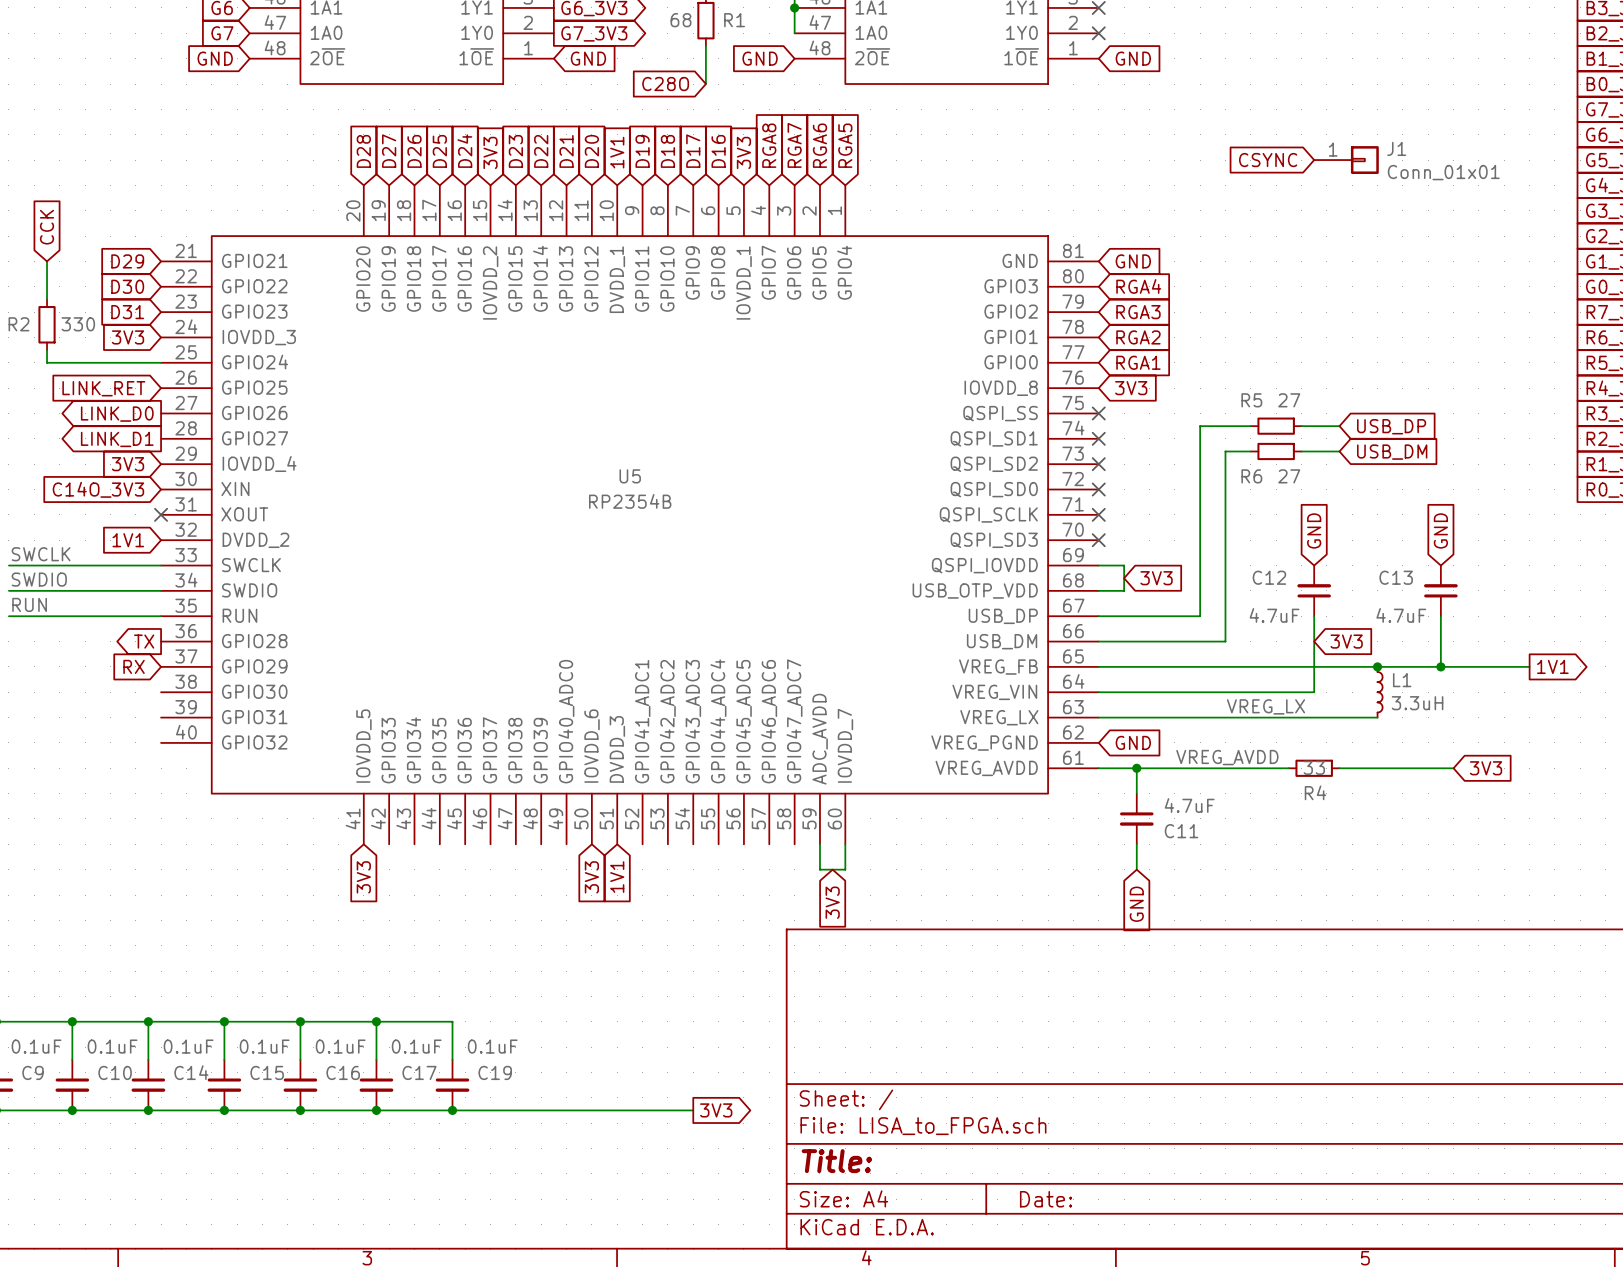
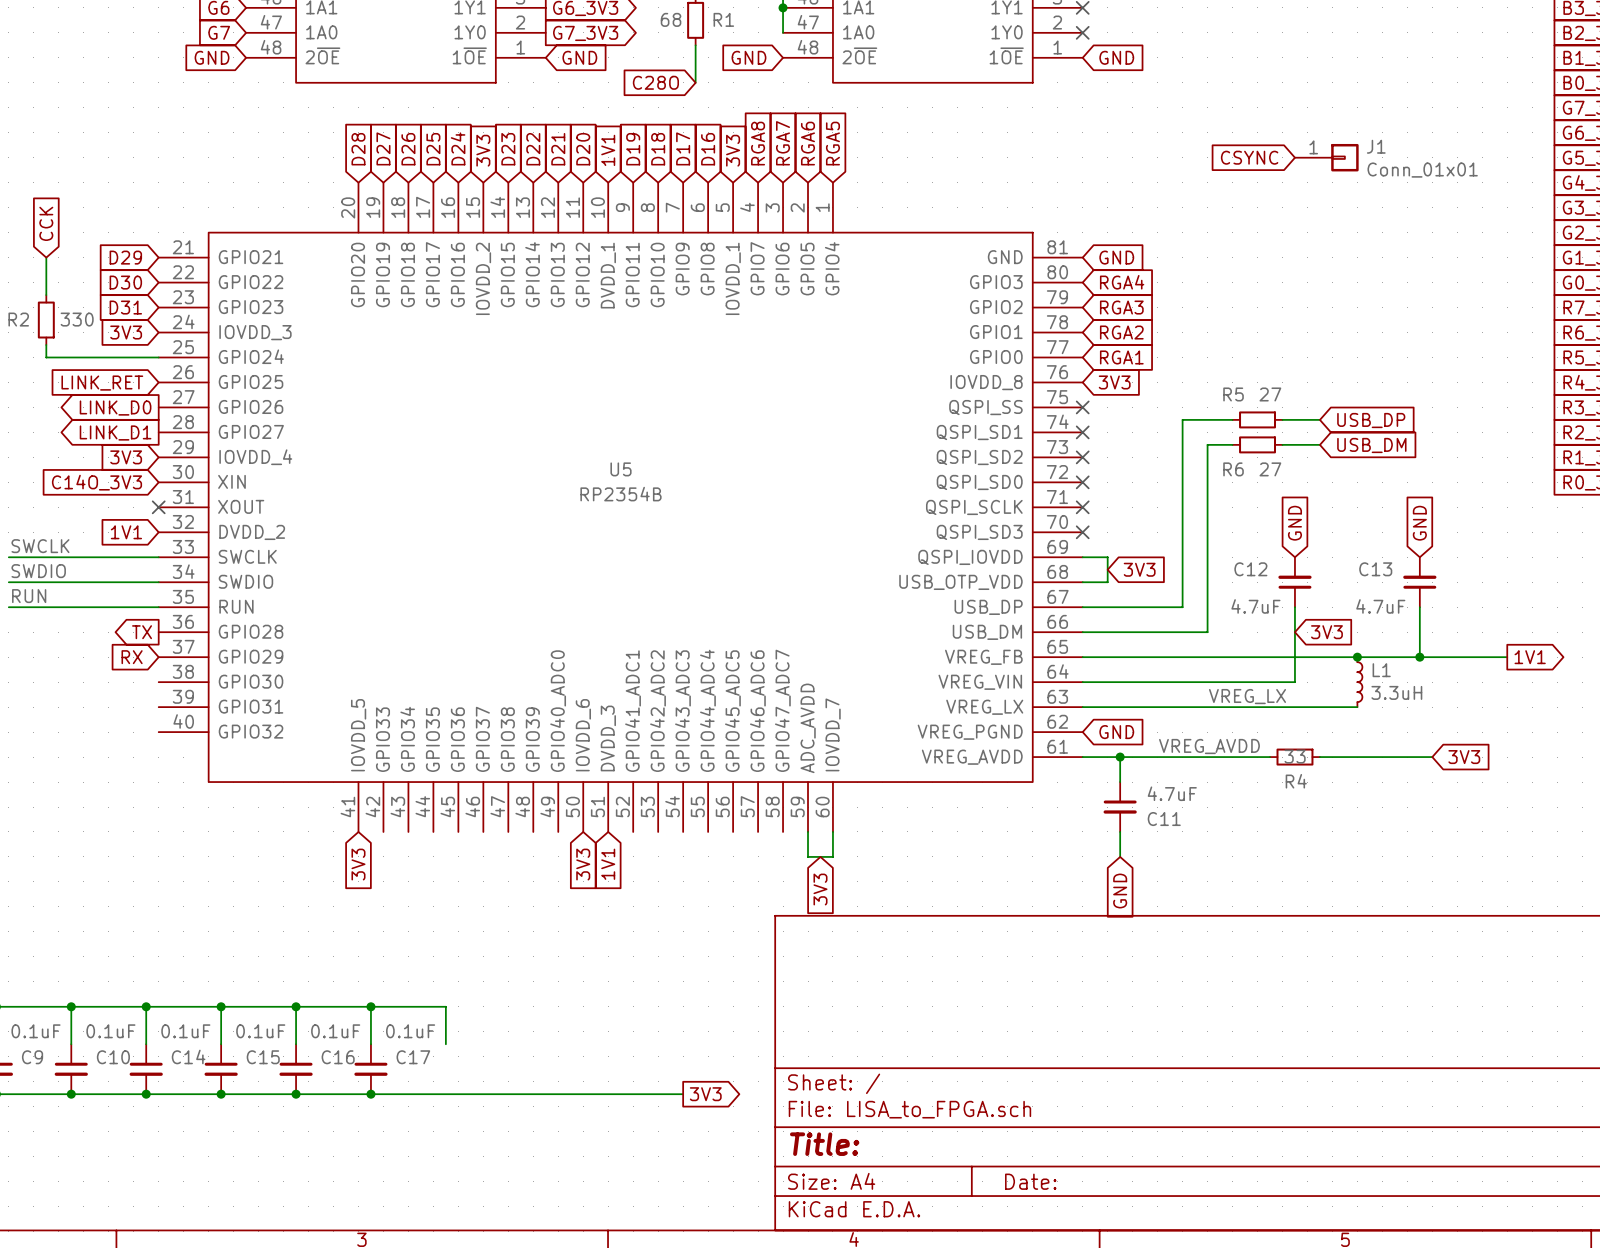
C19: 0.1uF (452, 1085) -> none
junction: (452, 1110) -> none

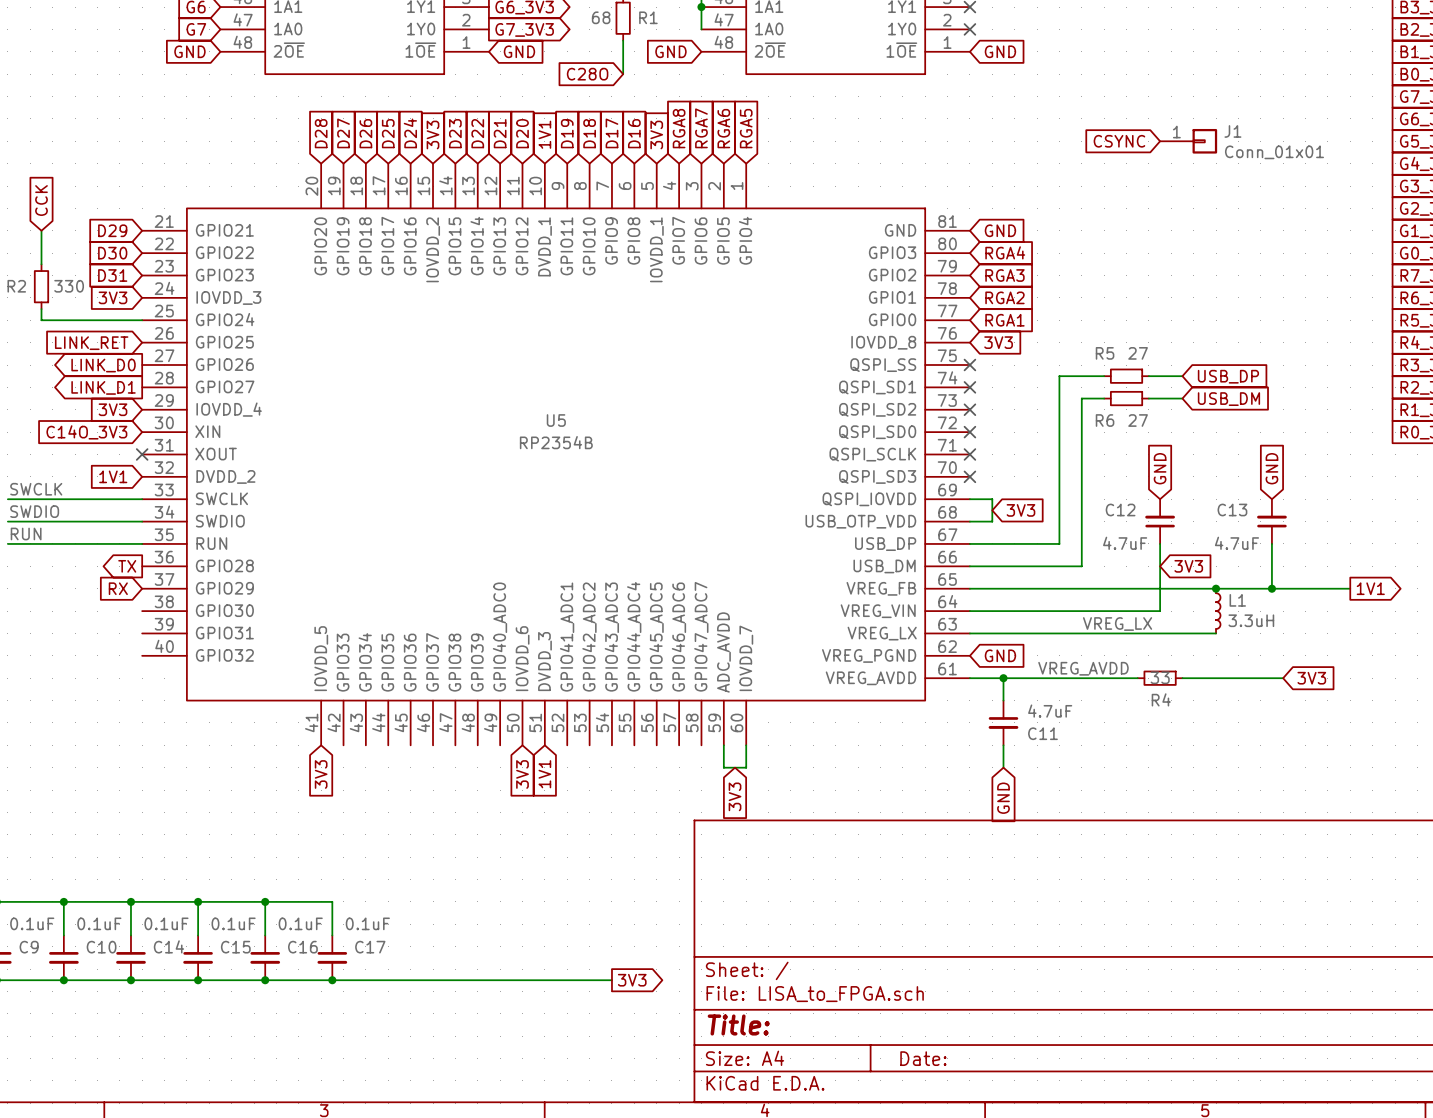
wire: (370, 1006) (445, 1006) (445, 1044) -> none
junction: (370, 1006) -> none

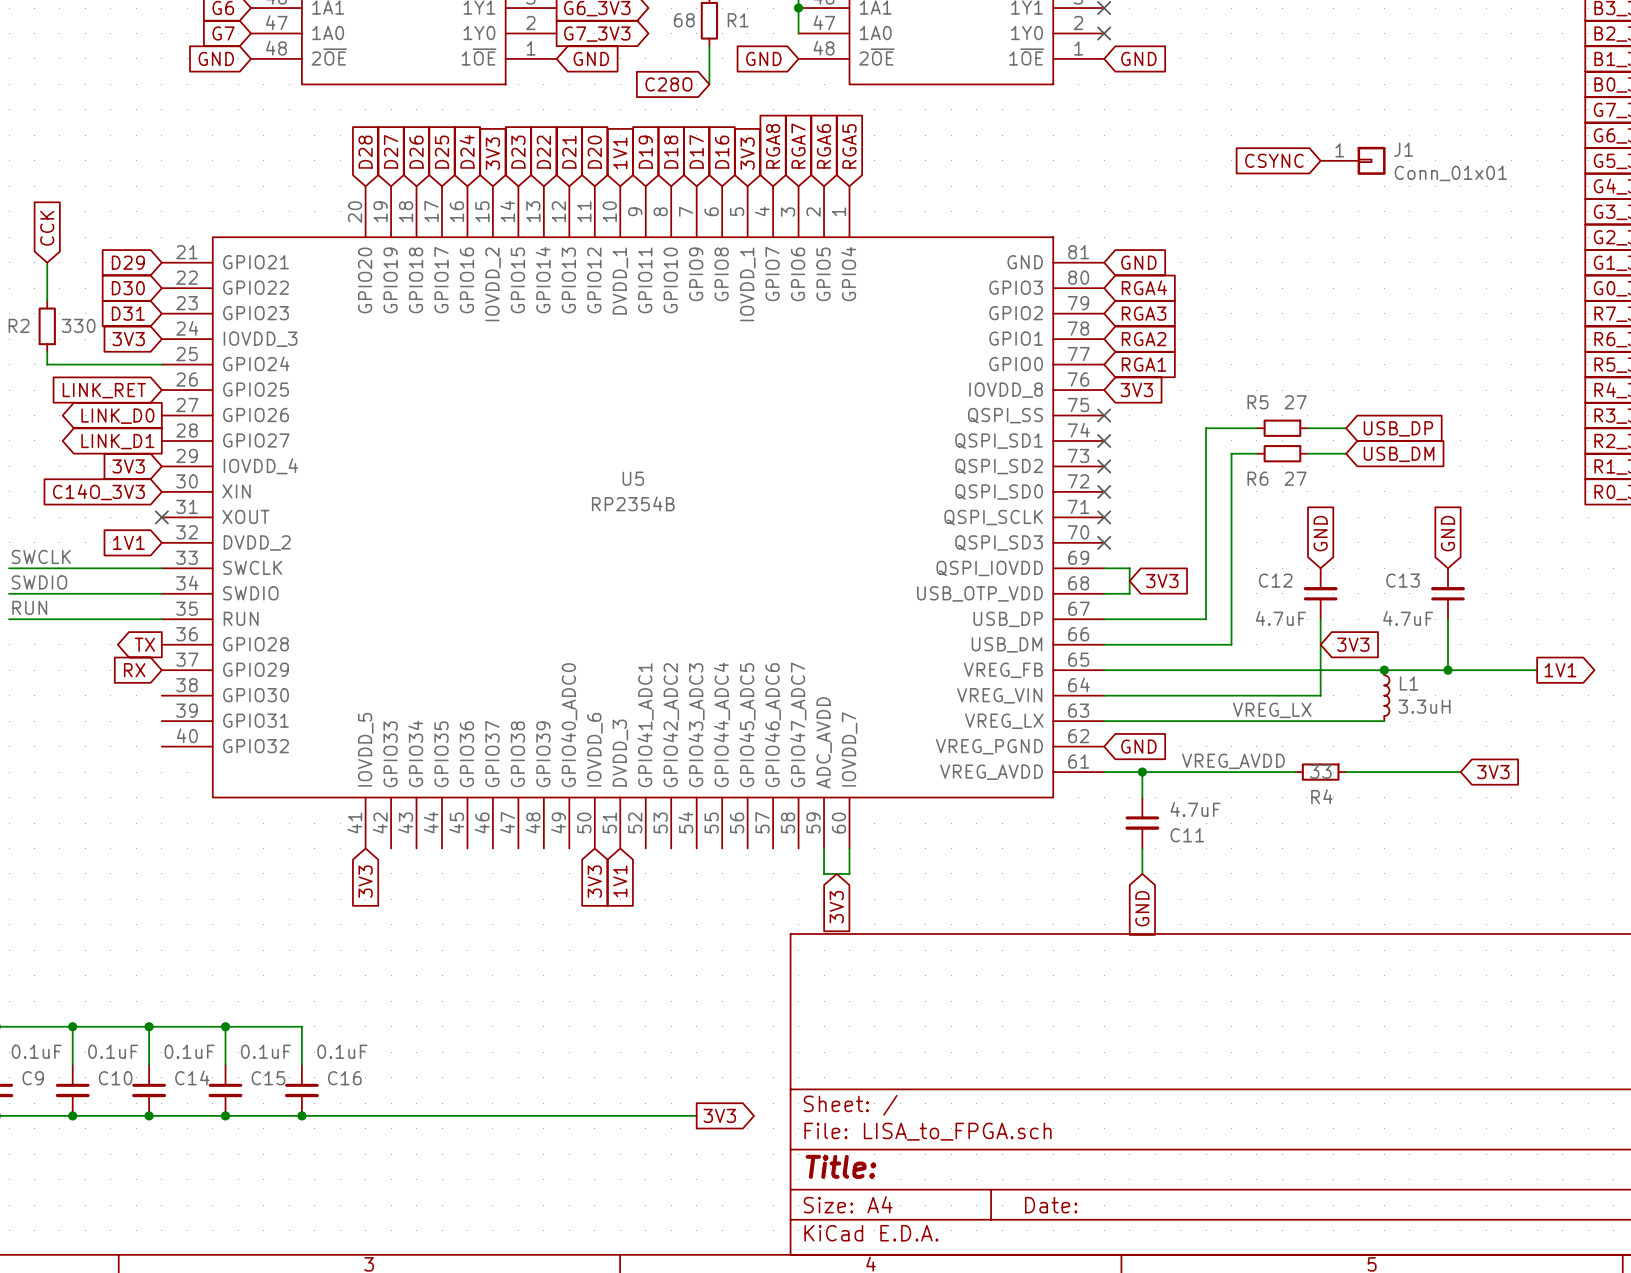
wire: (265, 901) (332, 901) (332, 935) -> none
junction: (265, 901) -> none
C17: 0.1uF (332, 957) -> none
junction: (332, 980) -> none

